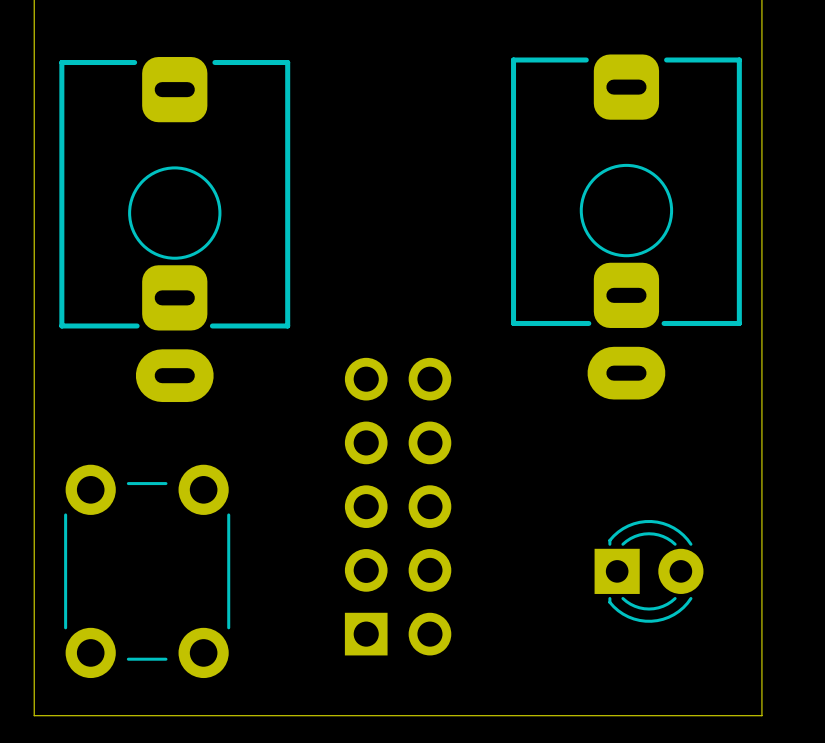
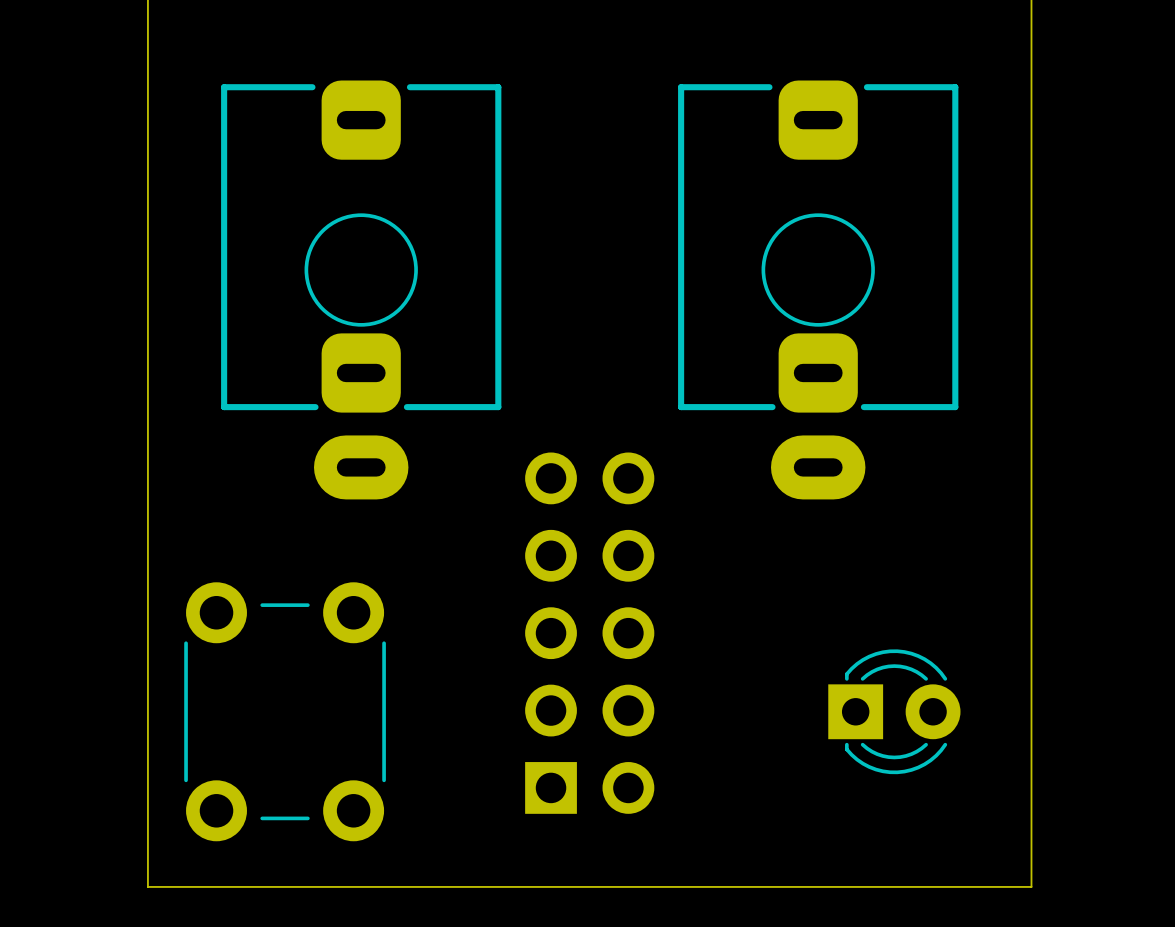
part position: (626, 226) -> (818, 289)
part position: (174, 229) -> (361, 289)

